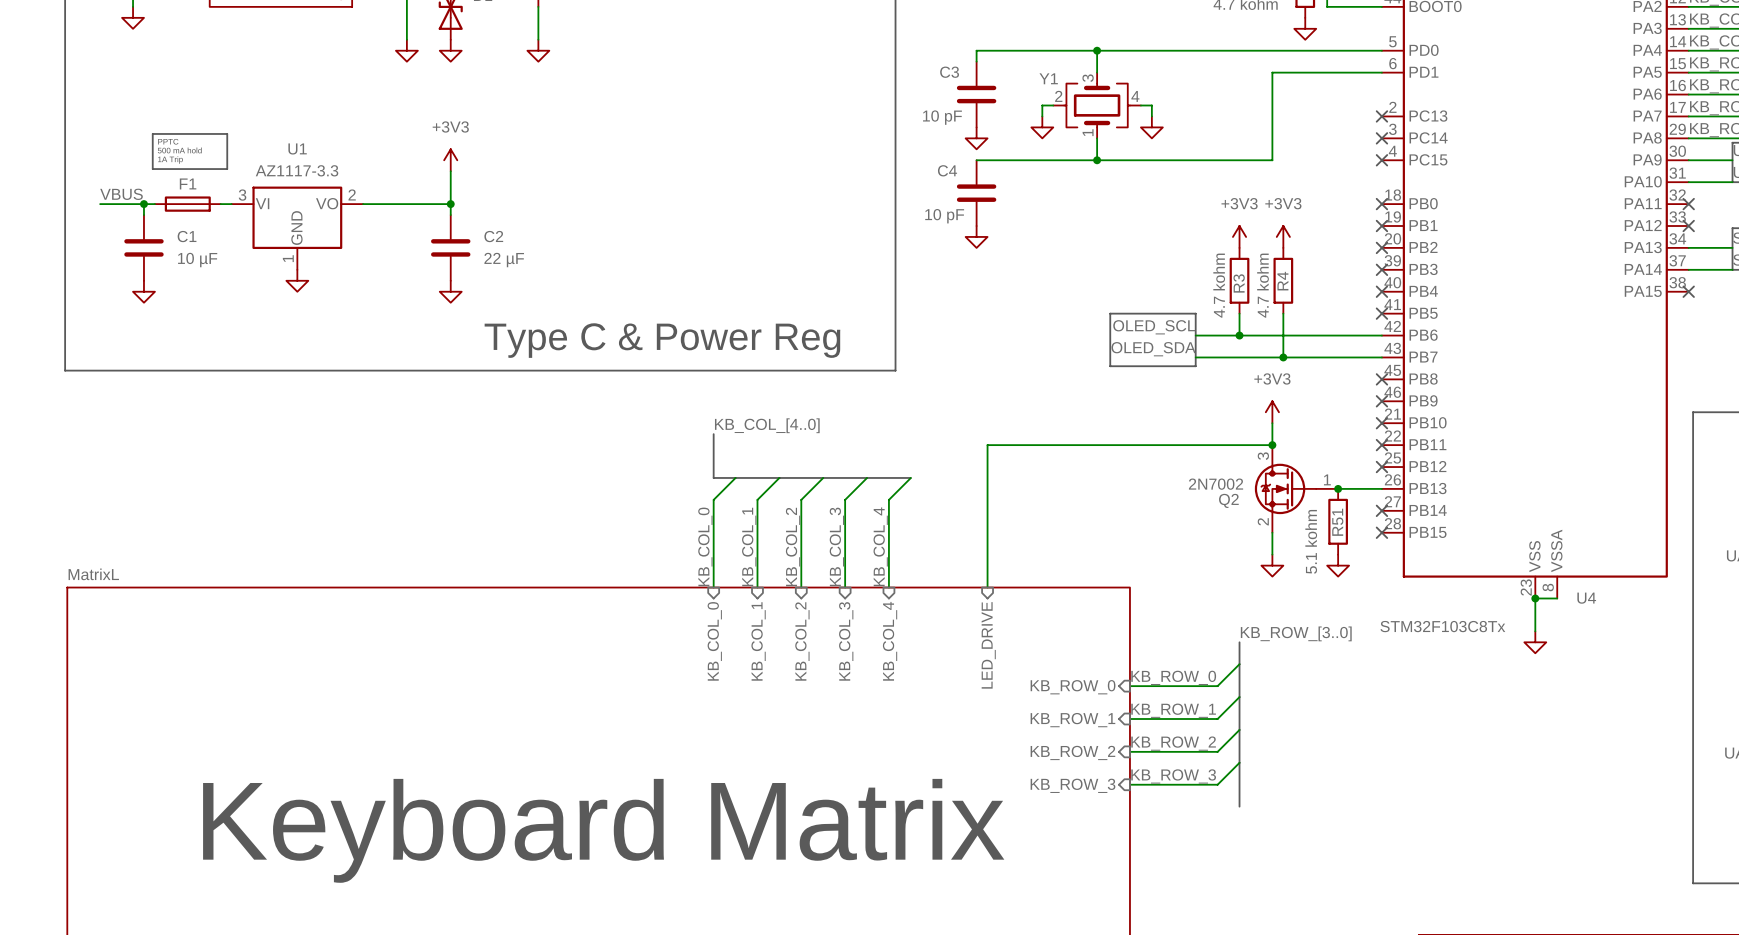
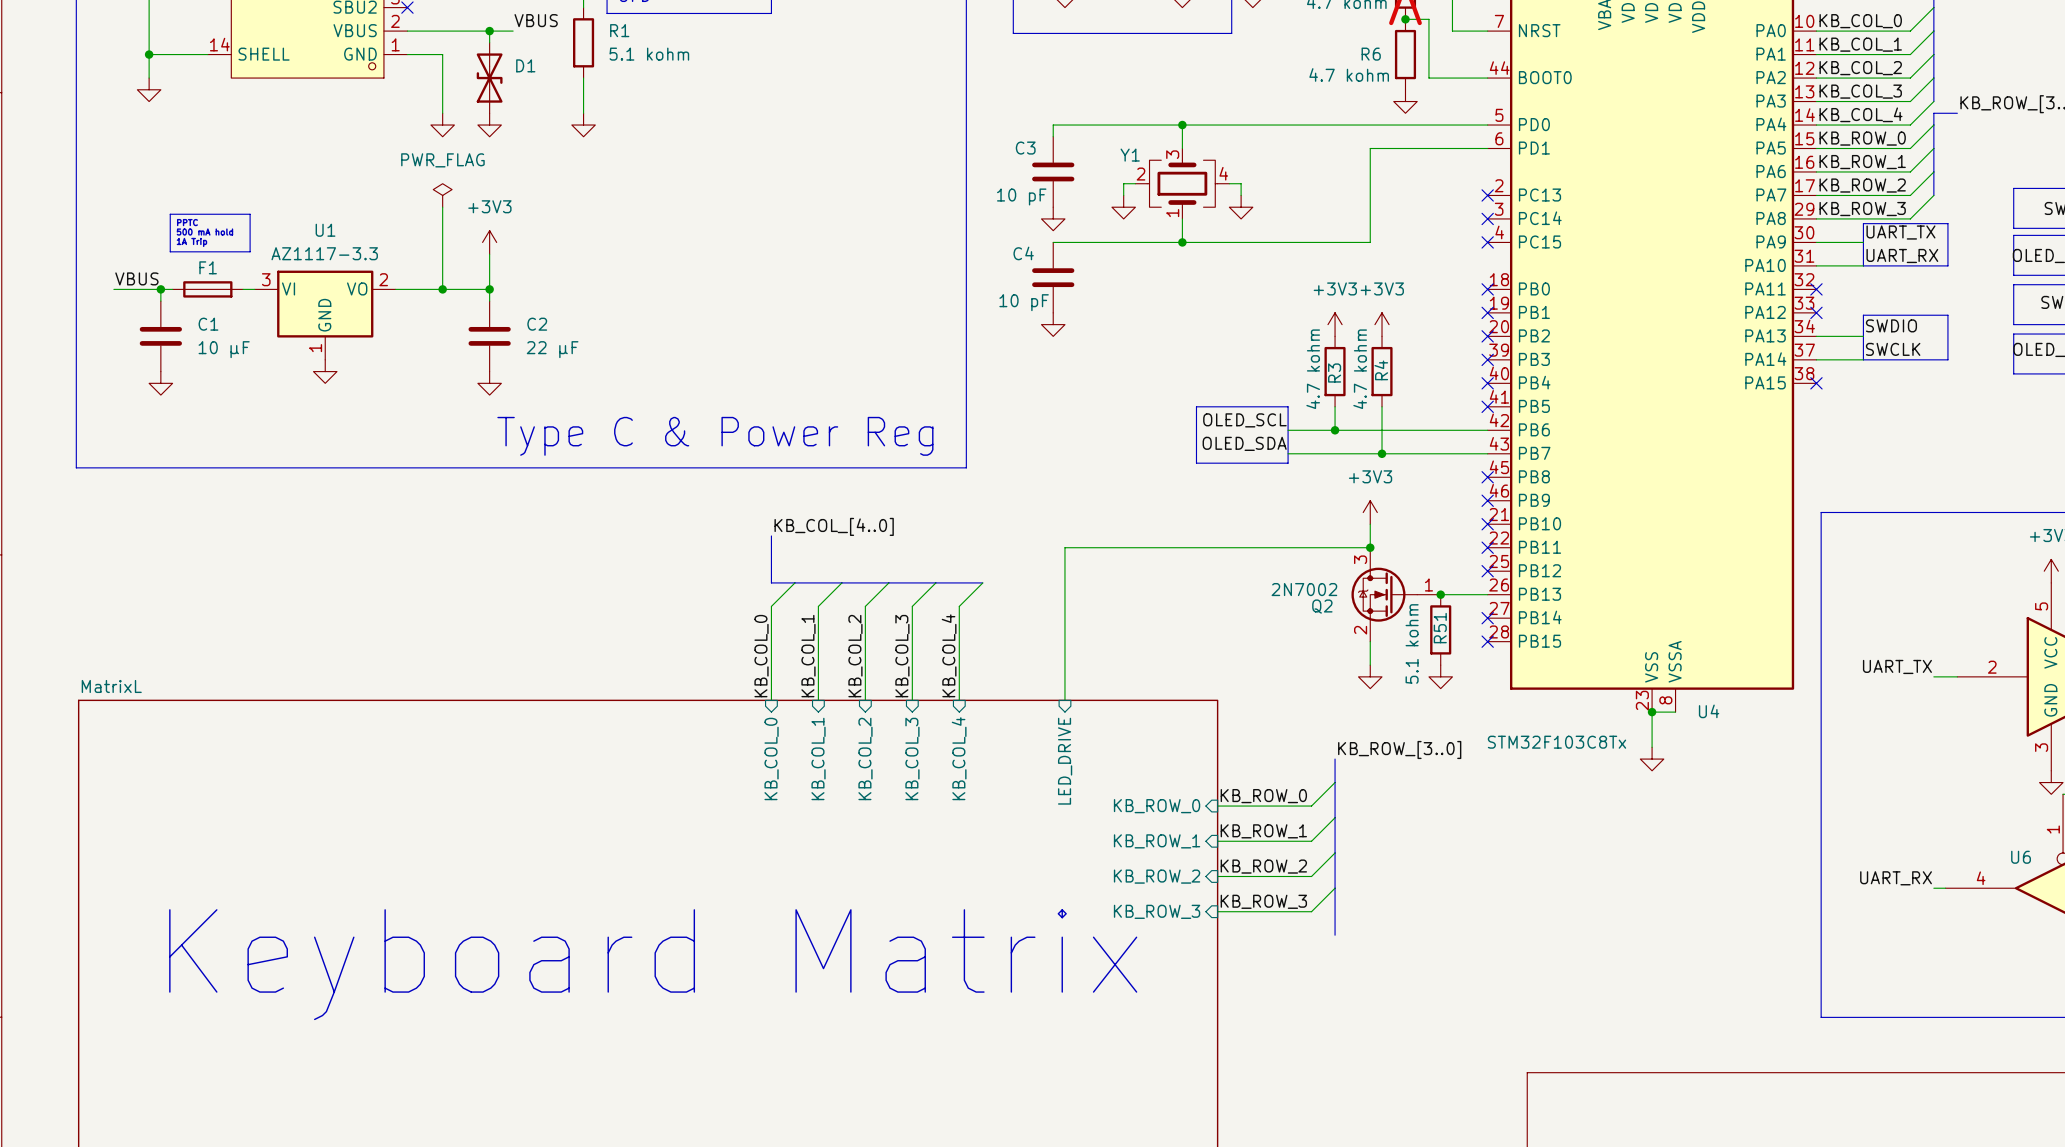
power symbol: none -> PWR_FLAG (442, 195)
wire: none -> (442, 207) (442, 289)
junction: none -> (442, 289)

